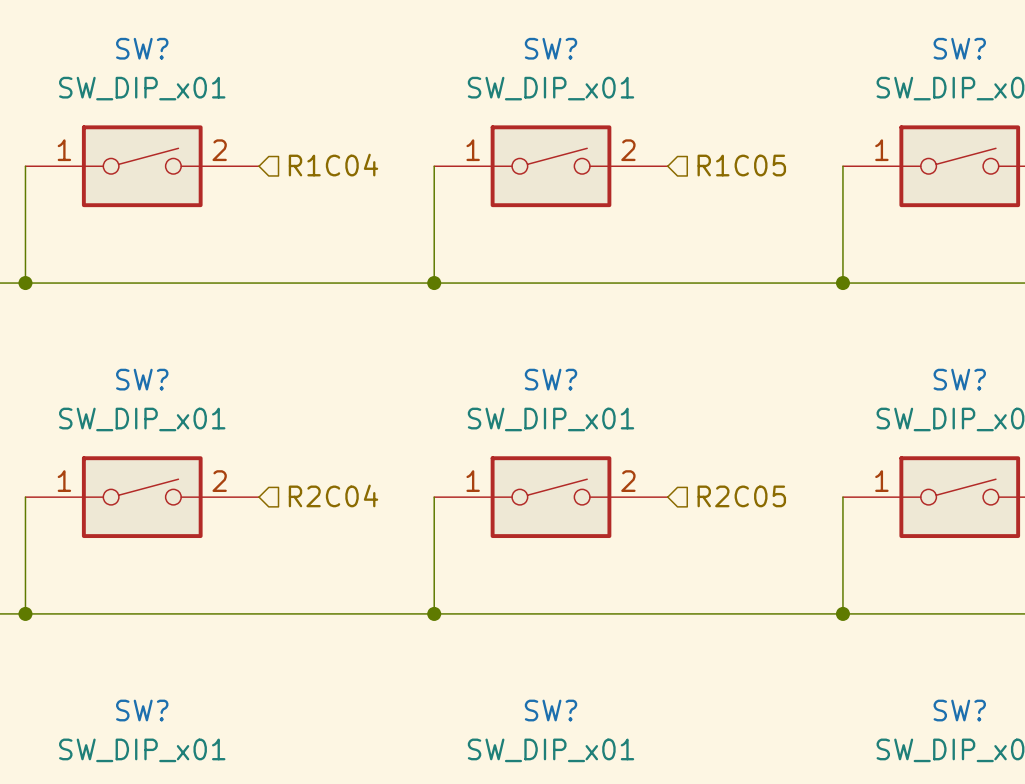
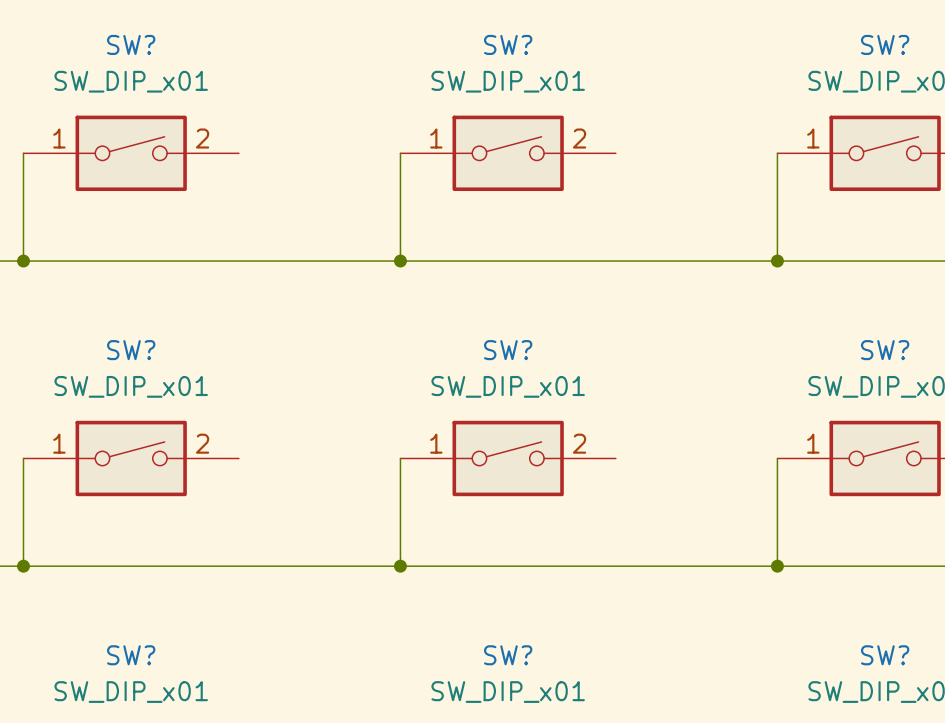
hierarchical label: R1C04 (333, 165) -> none
hierarchical label: R1C05 (741, 165) -> none
hierarchical label: R2C04 (333, 495) -> none
hierarchical label: R2C05 (741, 496) -> none

